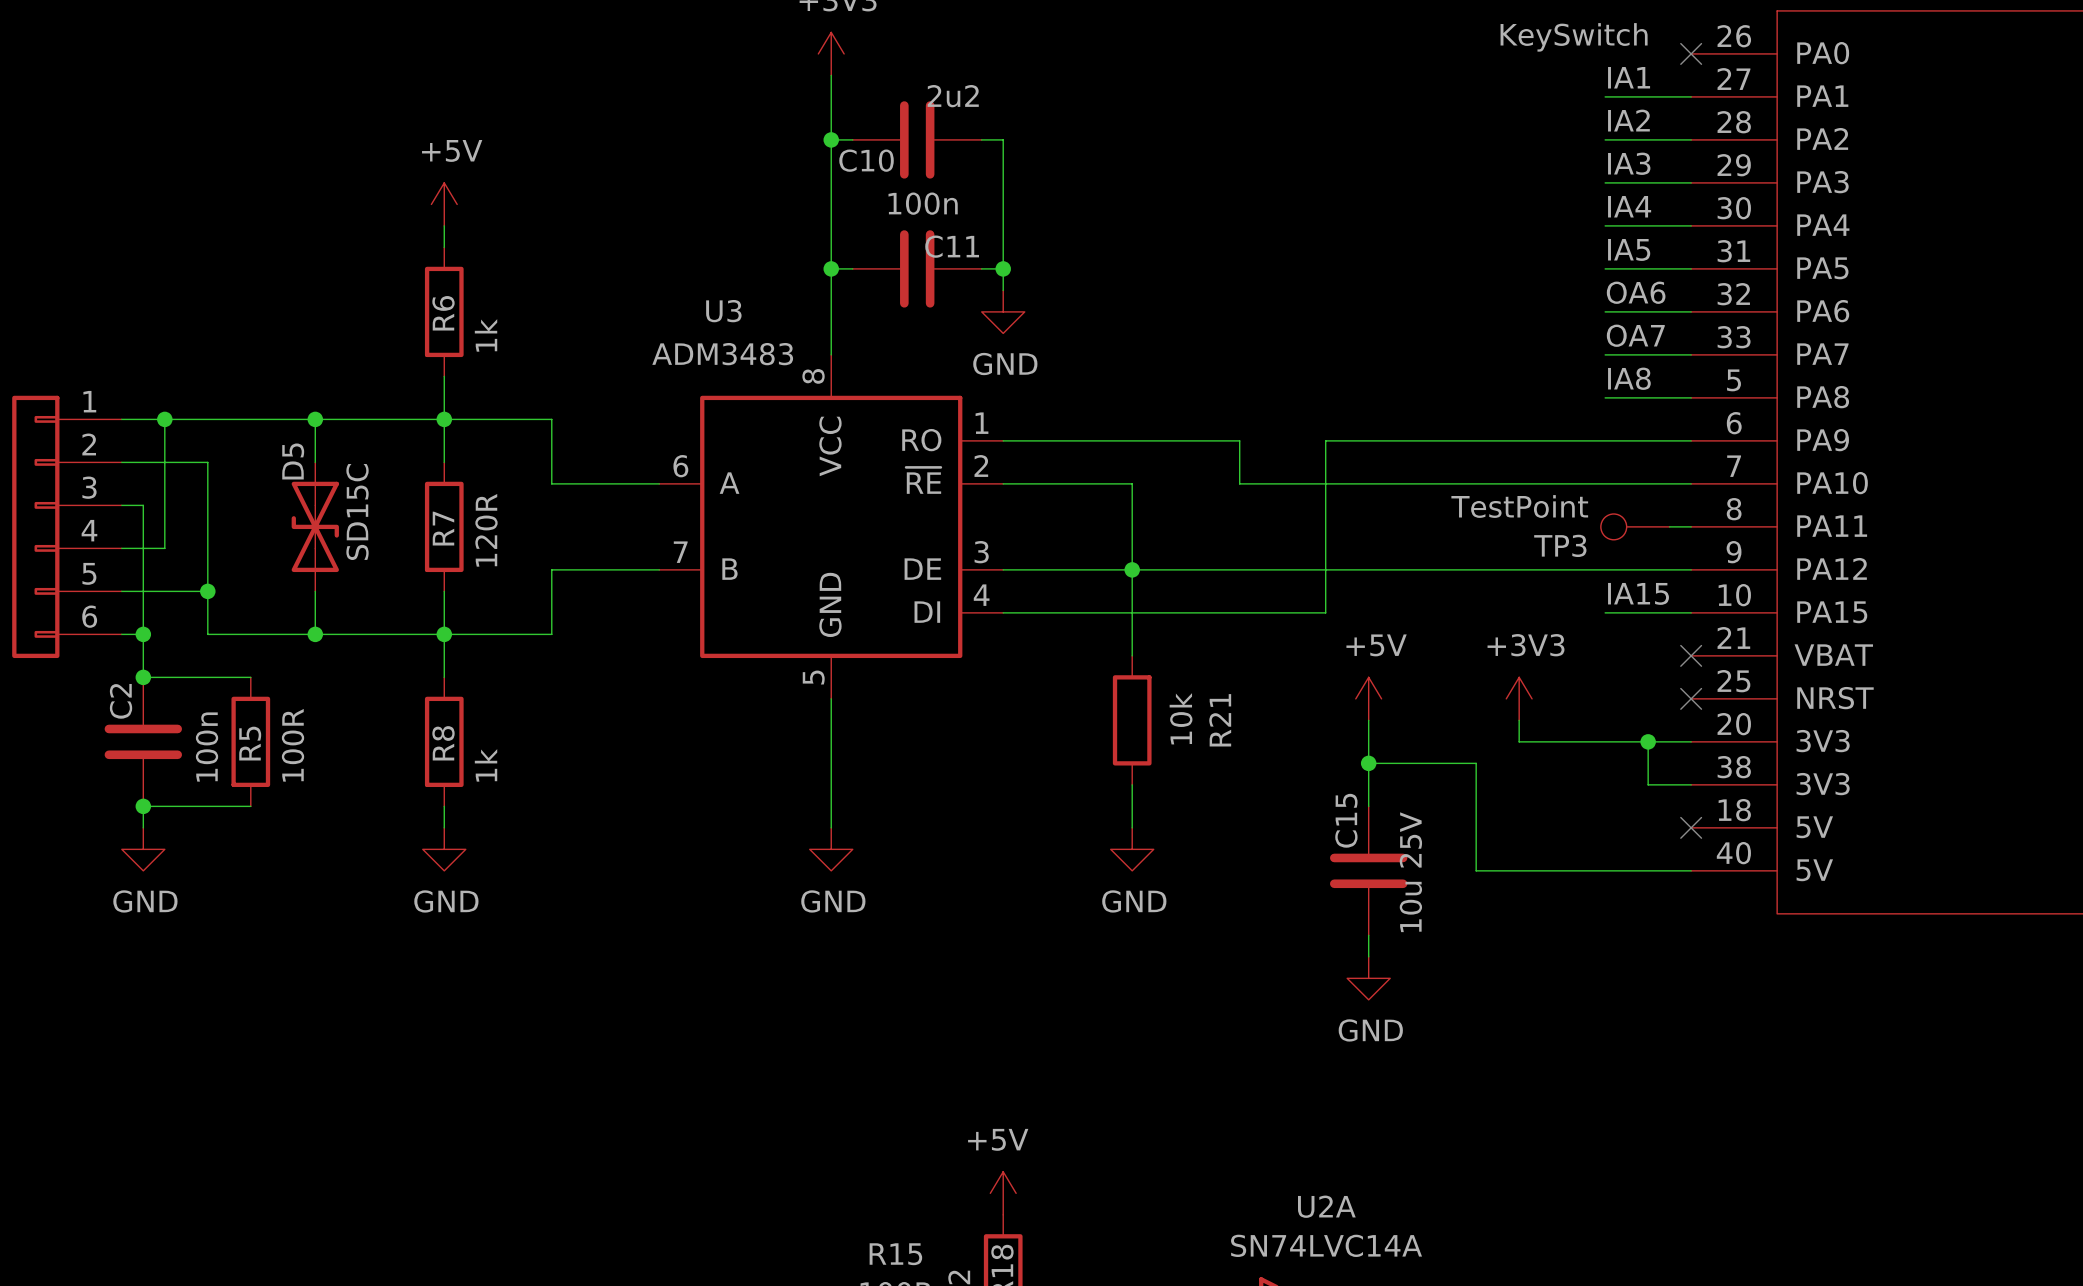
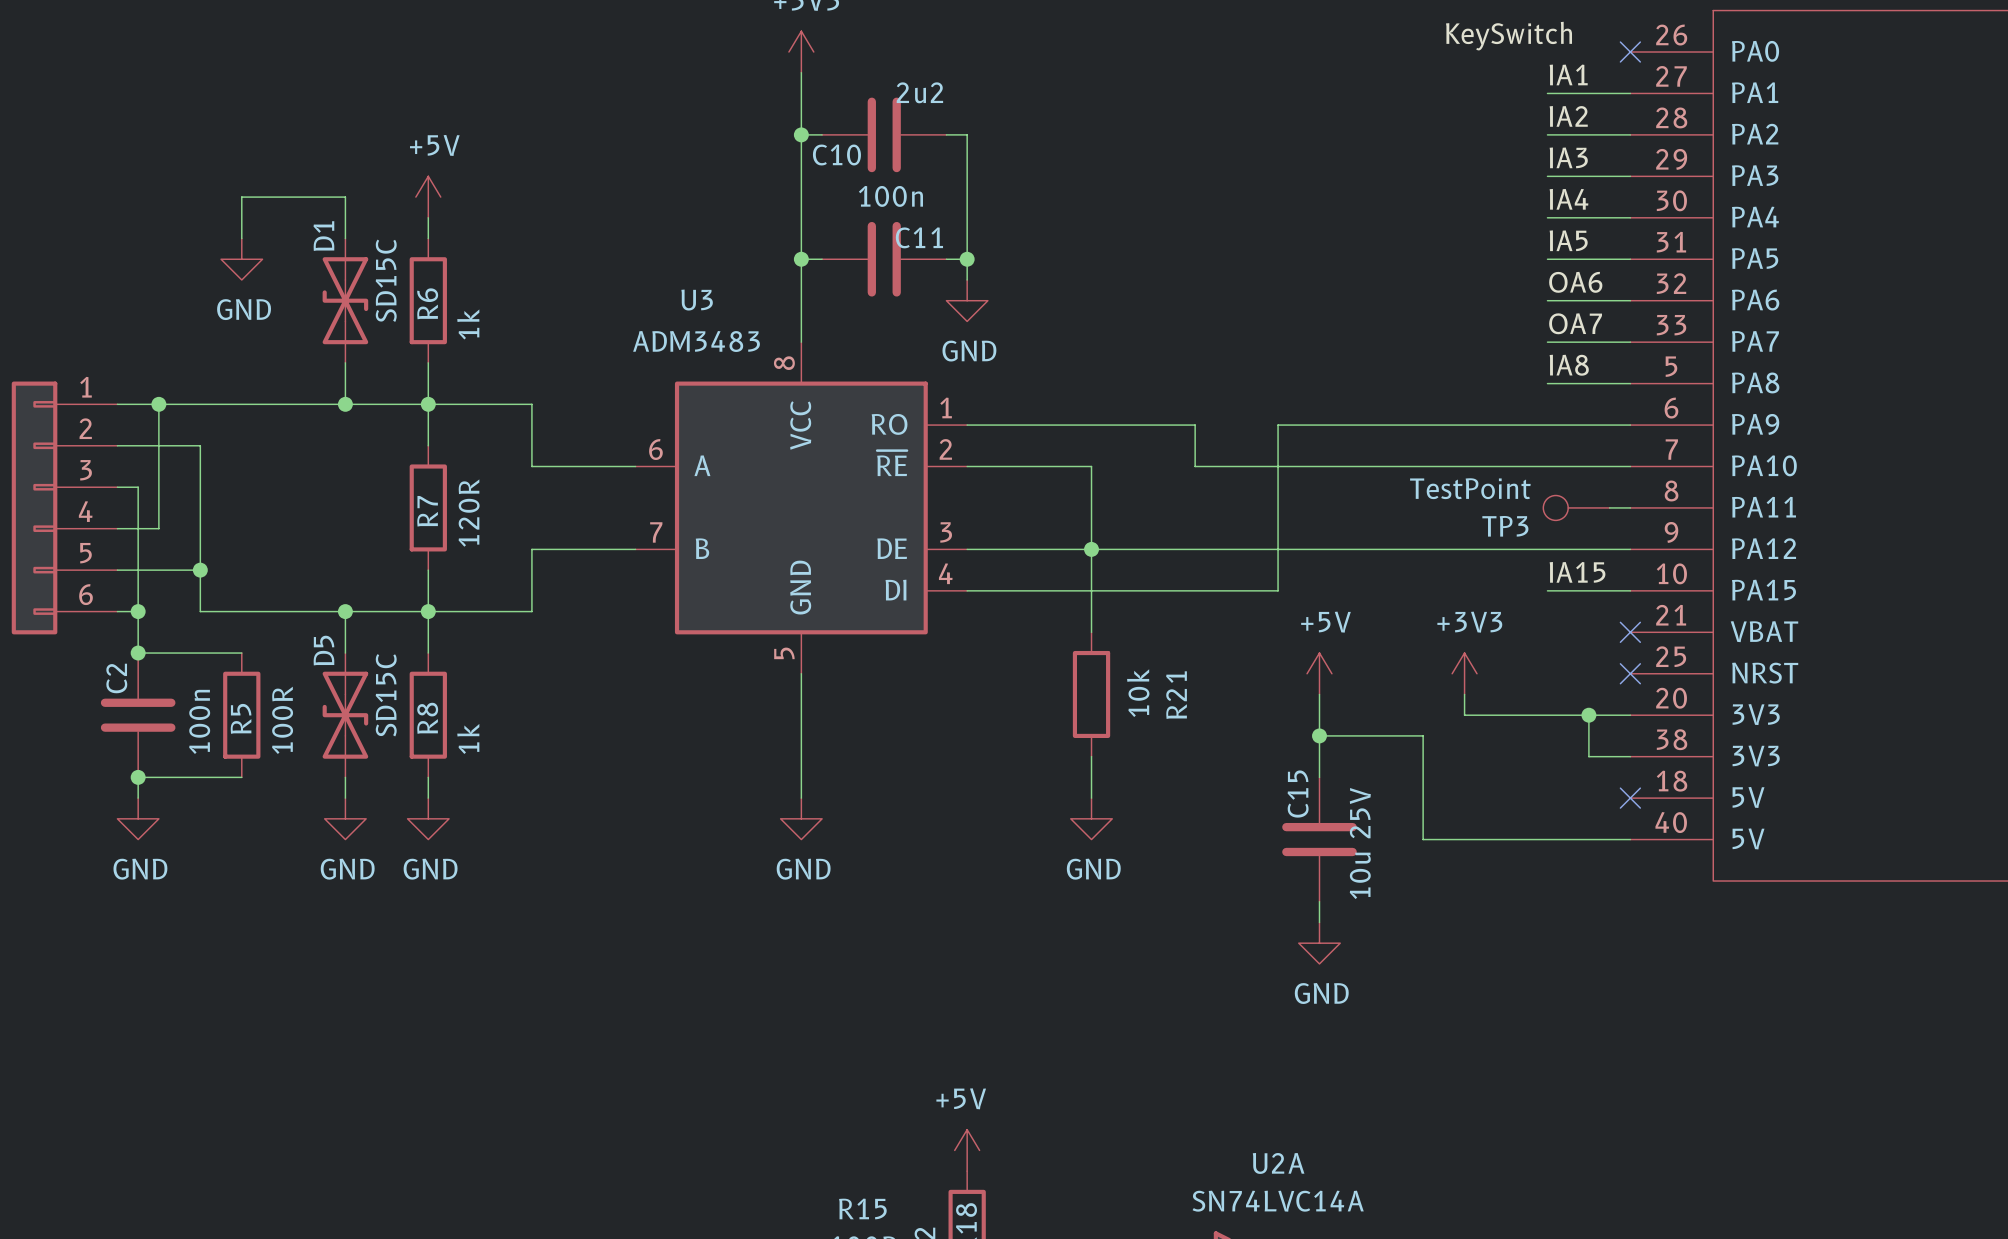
wire: none -> (241, 238) (241, 197) (345, 197) (345, 238)
power symbol: none -> GND (241, 259)
D1: none -> SD15C (345, 300)
wire: (315, 419) (315, 462) -> (345, 362) (345, 404)
junction position: (315, 419) -> (345, 404)
D5 position: (315, 526) -> (345, 715)
wire: (315, 591) (315, 634) -> (345, 611) (345, 653)
junction position: (315, 634) -> (345, 611)
wire: none -> (345, 777) (345, 798)
power symbol: none -> GND (345, 818)

